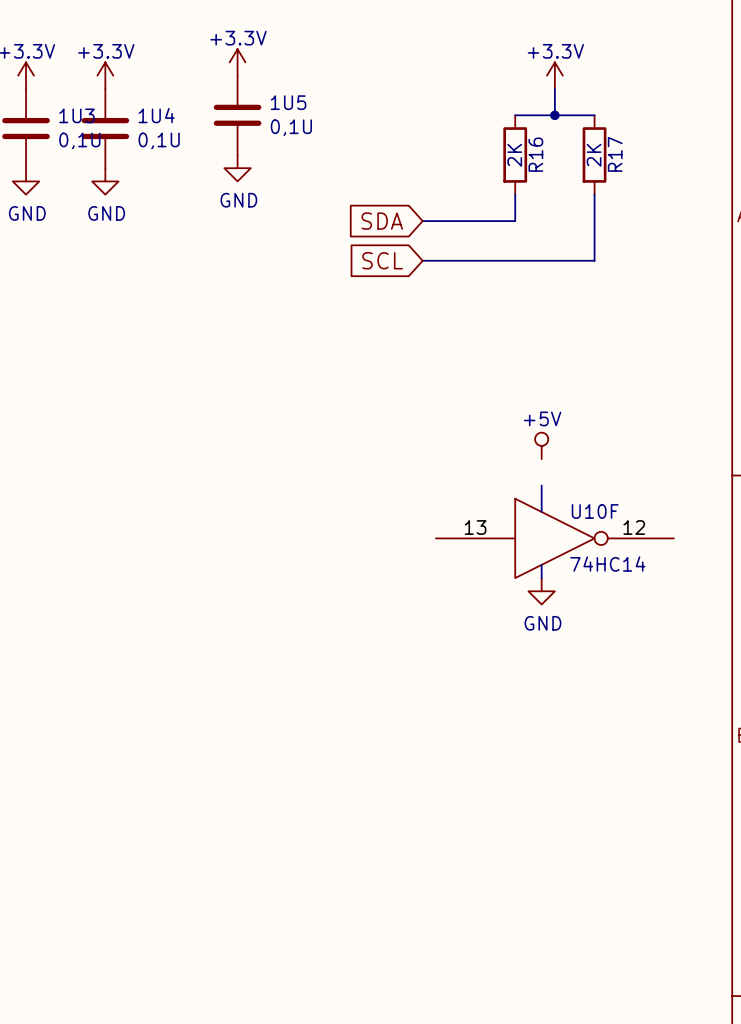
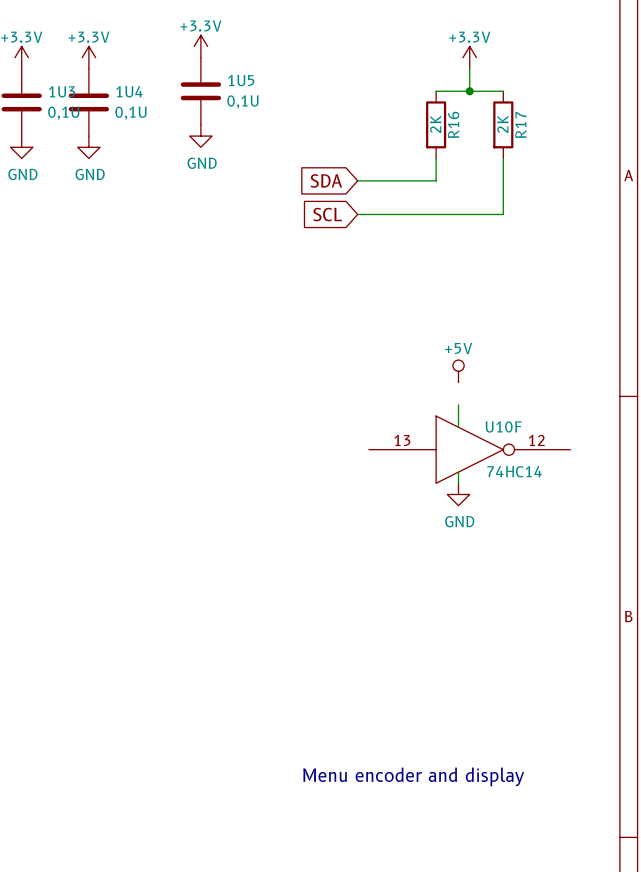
text: none -> Menu encoder and display (413, 776)

